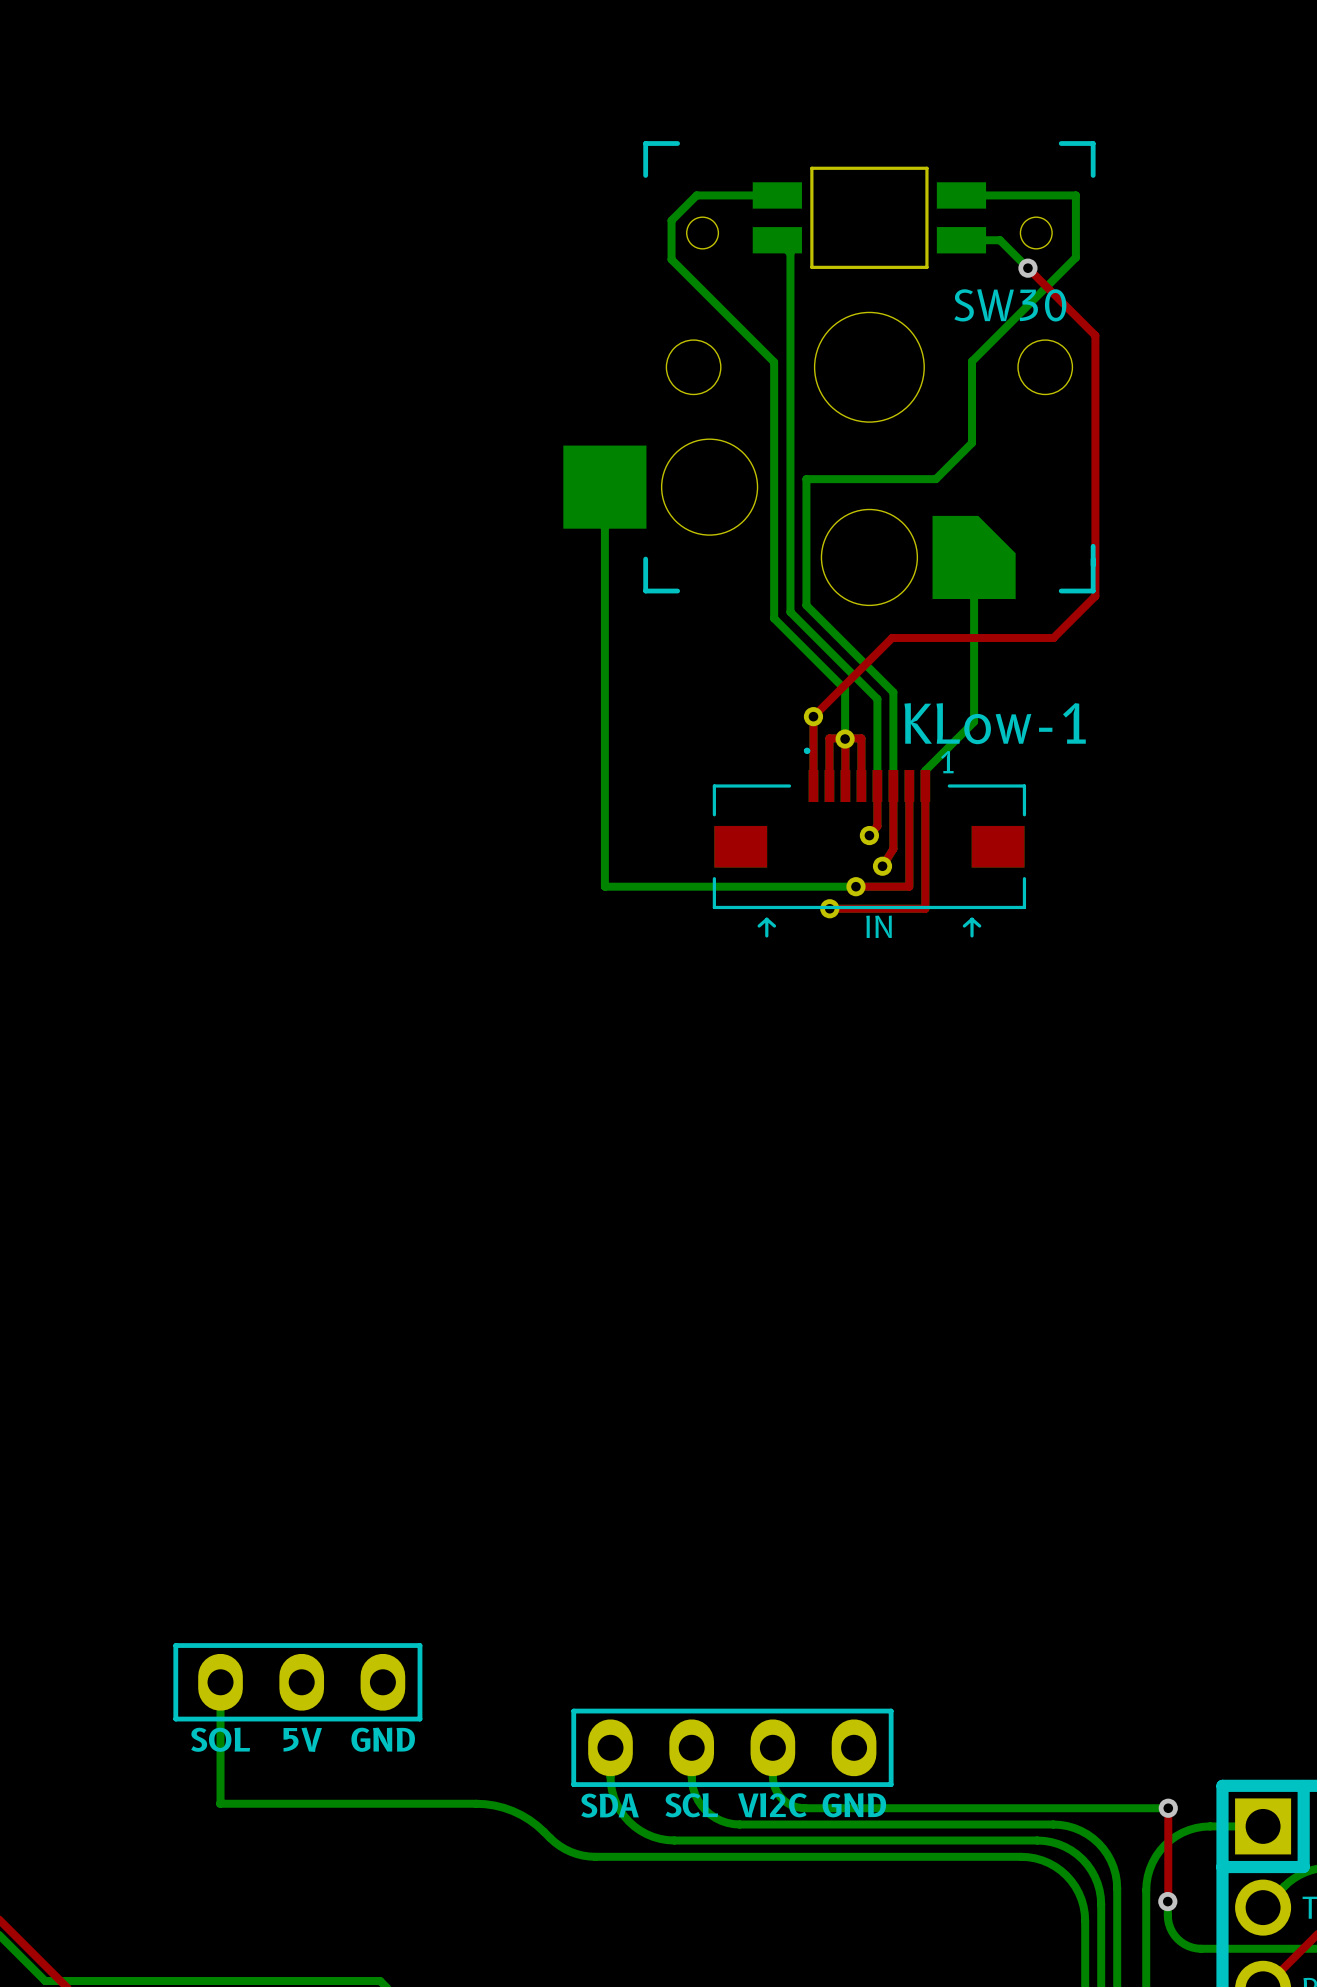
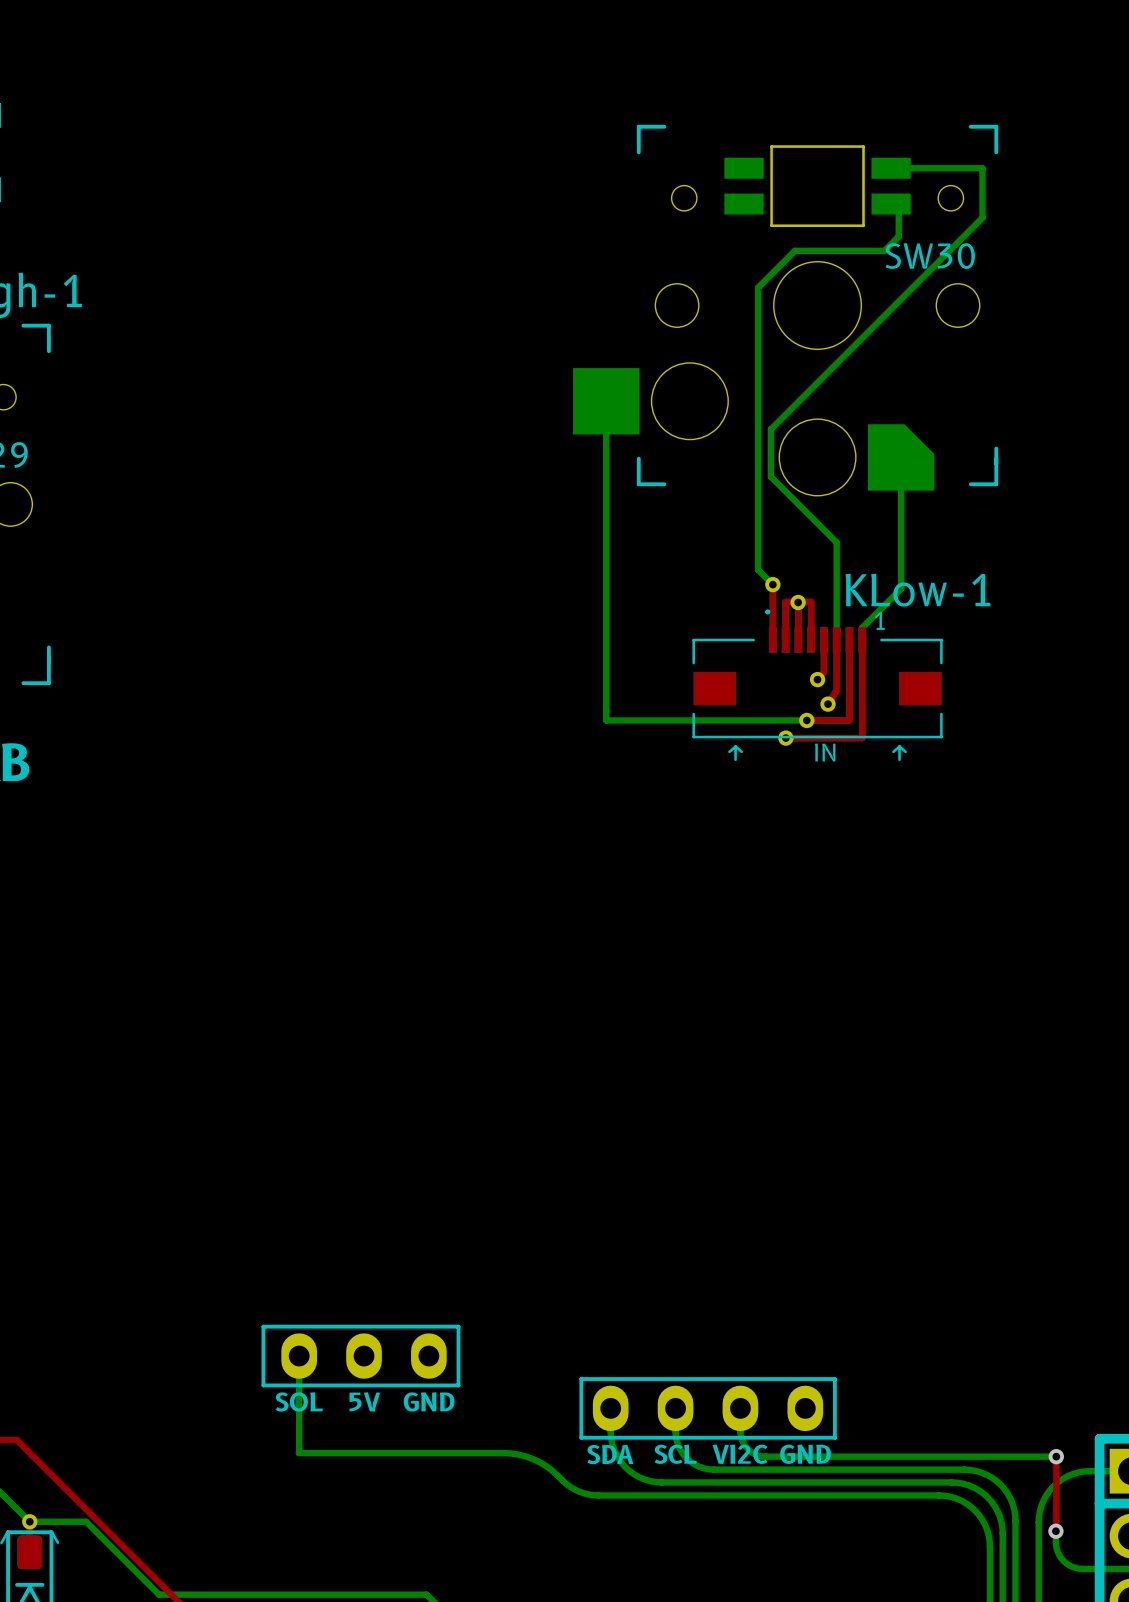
bottom track: (777, 195) (696, 195) (671, 220) (671, 259) (774, 362) (774, 618) (845, 689) (845, 739) -> none
bottom track: (777, 240) (790, 253) (790, 612) (877, 699) (877, 786) -> none
bottom track: (961, 240) (1000, 240) (1027, 268) -> (891, 204) (898, 211) (898, 236) (884, 250) (794, 250) (758, 287) (758, 569) (772, 584)
top track: (1027, 268) (1095, 335) (1095, 596) (1053, 638) (892, 638) (813, 716) -> none
via: (1027, 268) -> none
bottom track: (972, 361) (972, 443) (935, 479) (806, 479) (806, 605) (893, 692) -> (899, 300) (770, 429) (770, 476) (836, 542) (836, 565)

